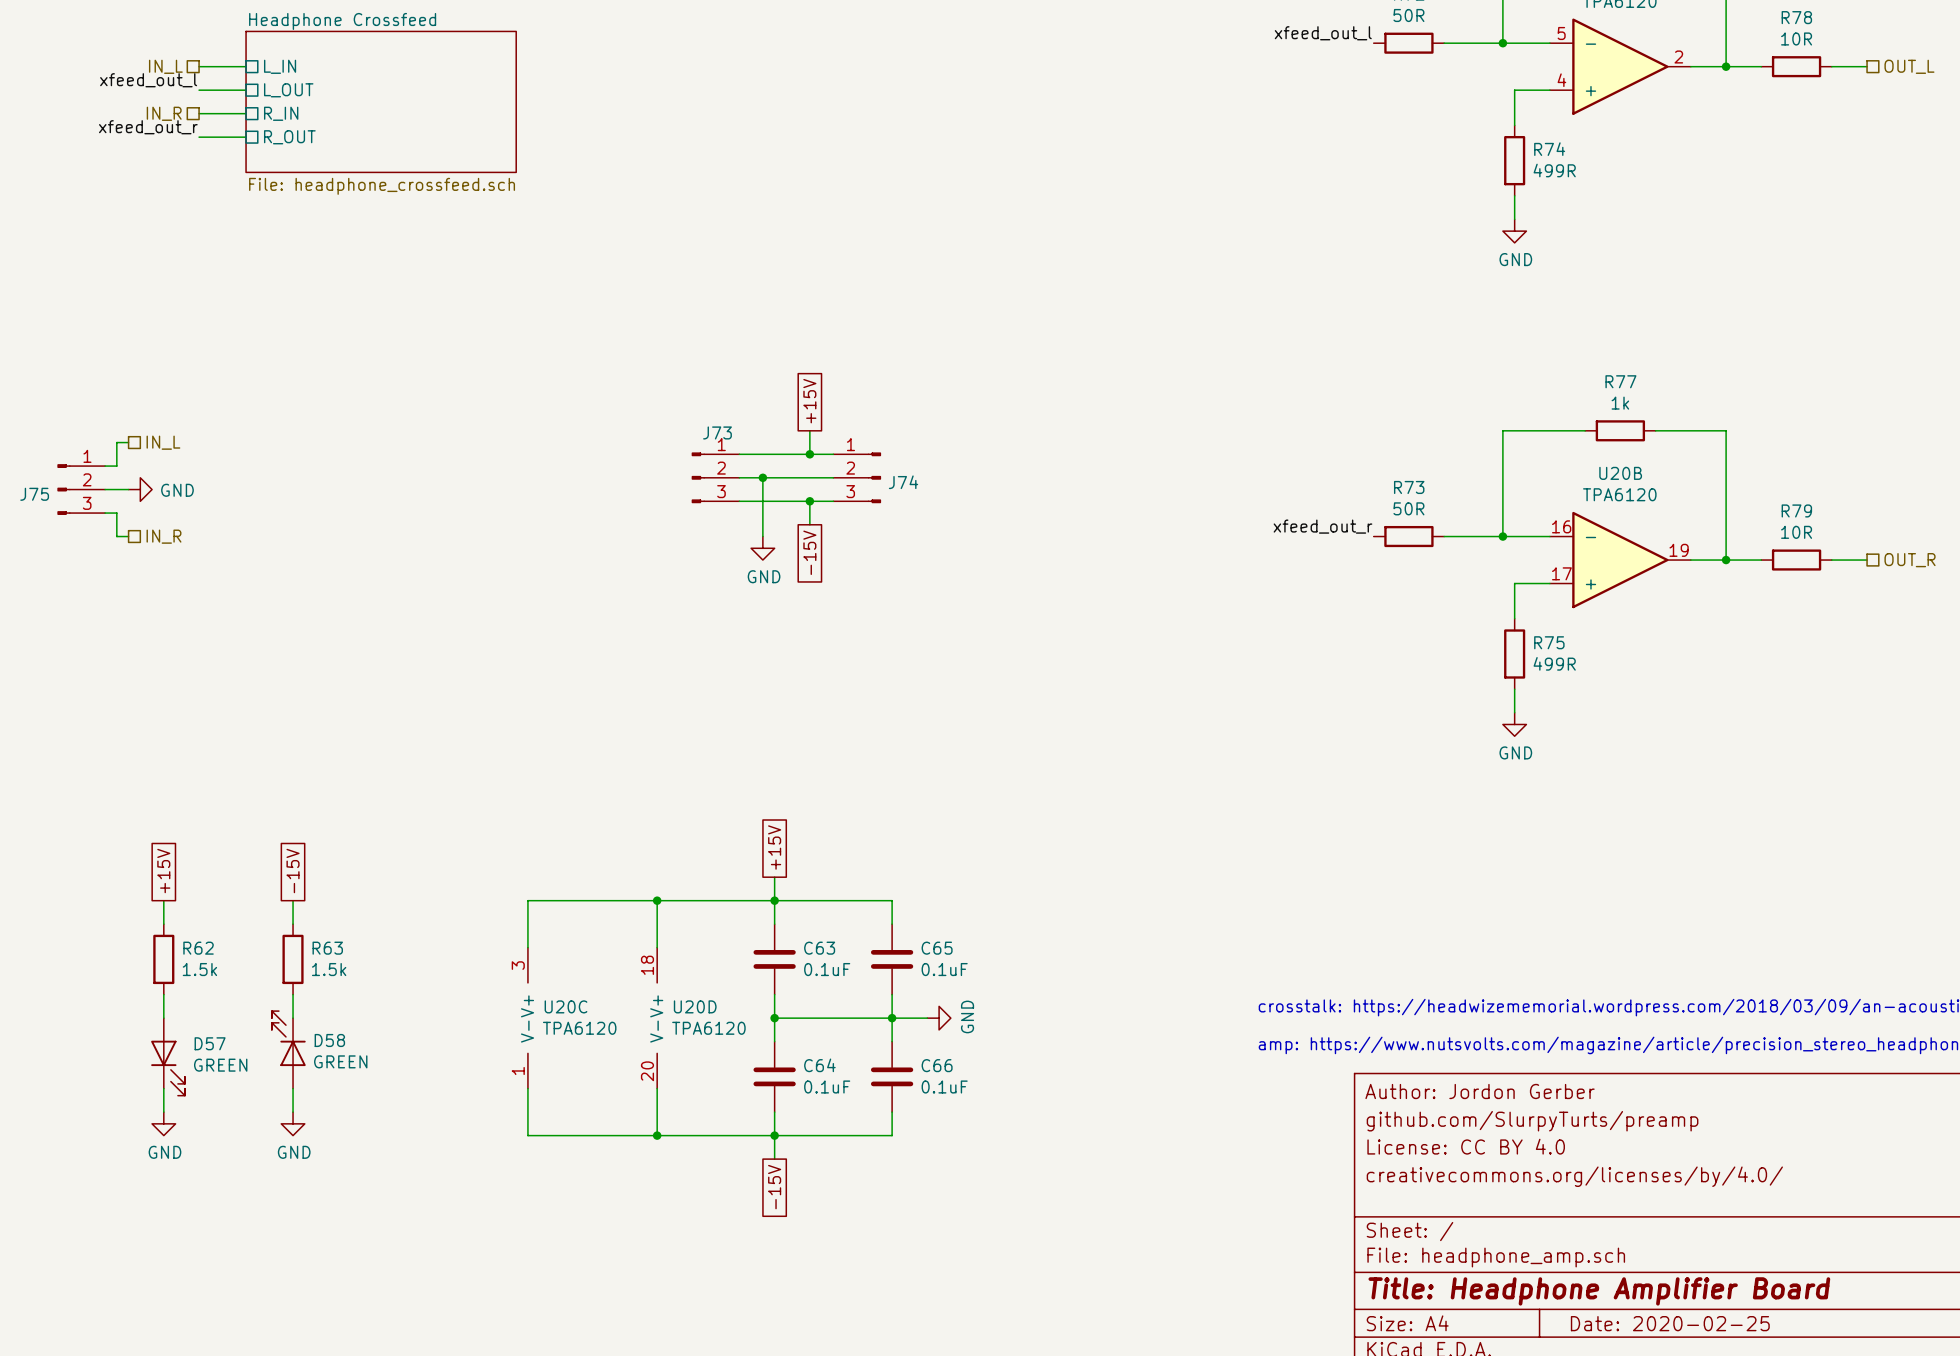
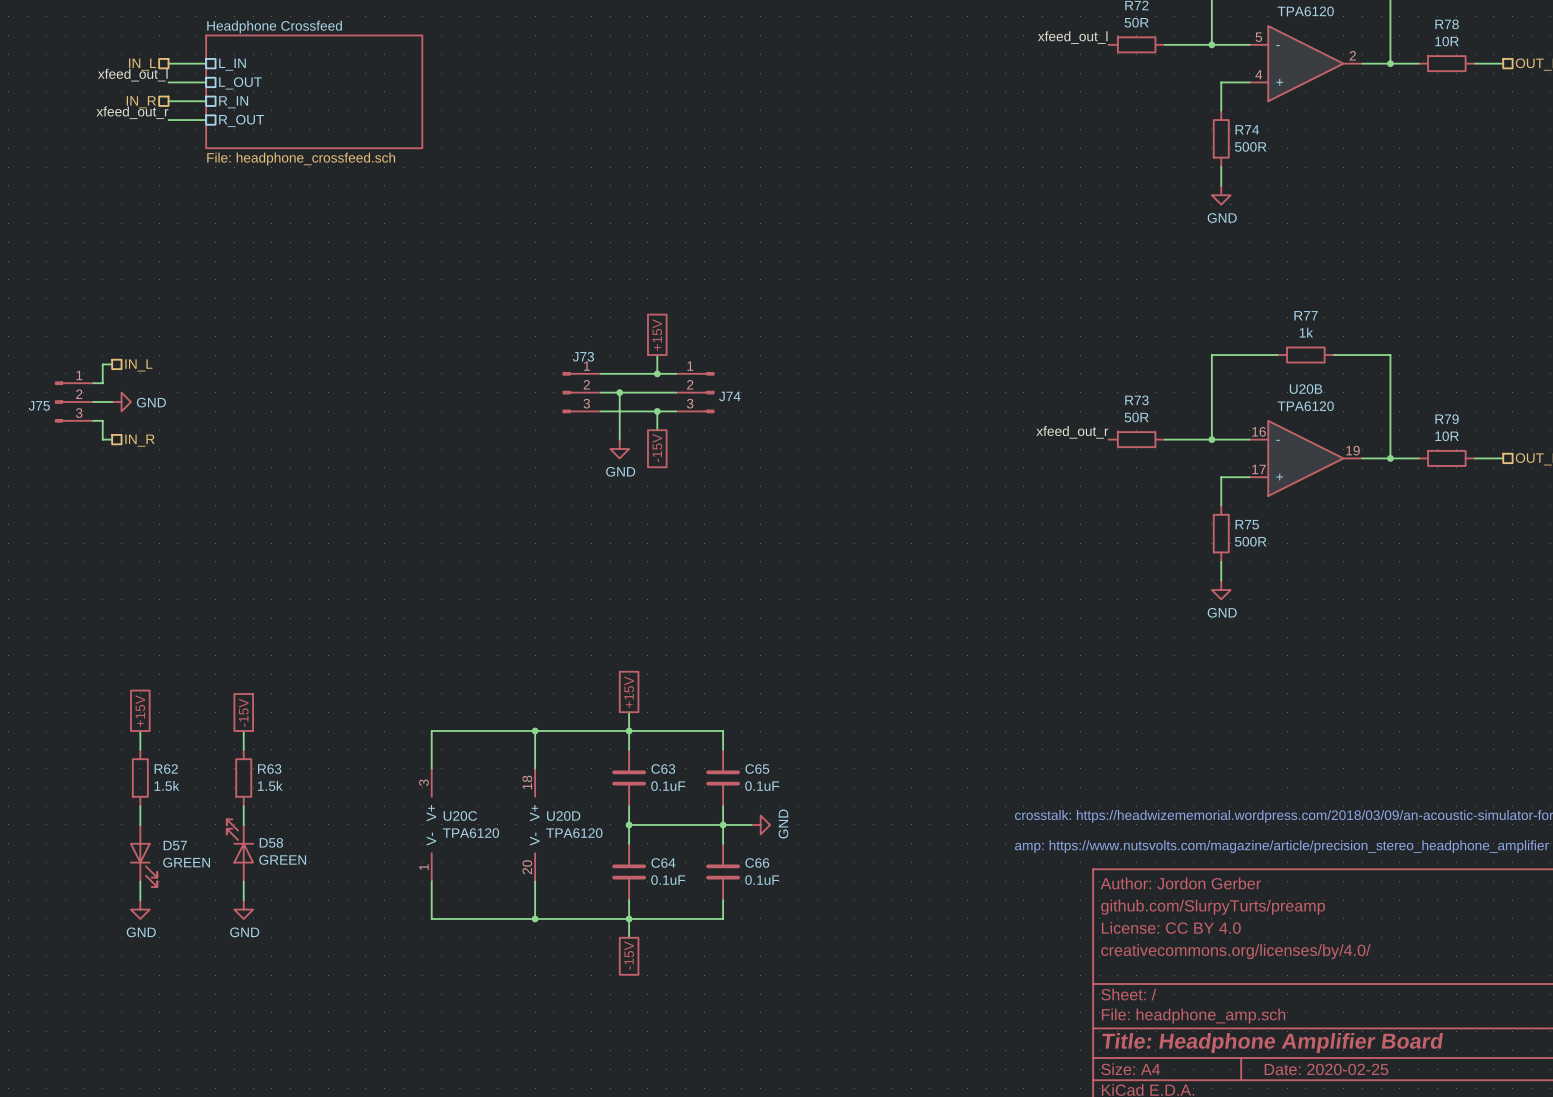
R74 value: 499R (1554, 170) -> 500R (1250, 146)
R75 value: 499R (1554, 663) -> 500R (1250, 541)

